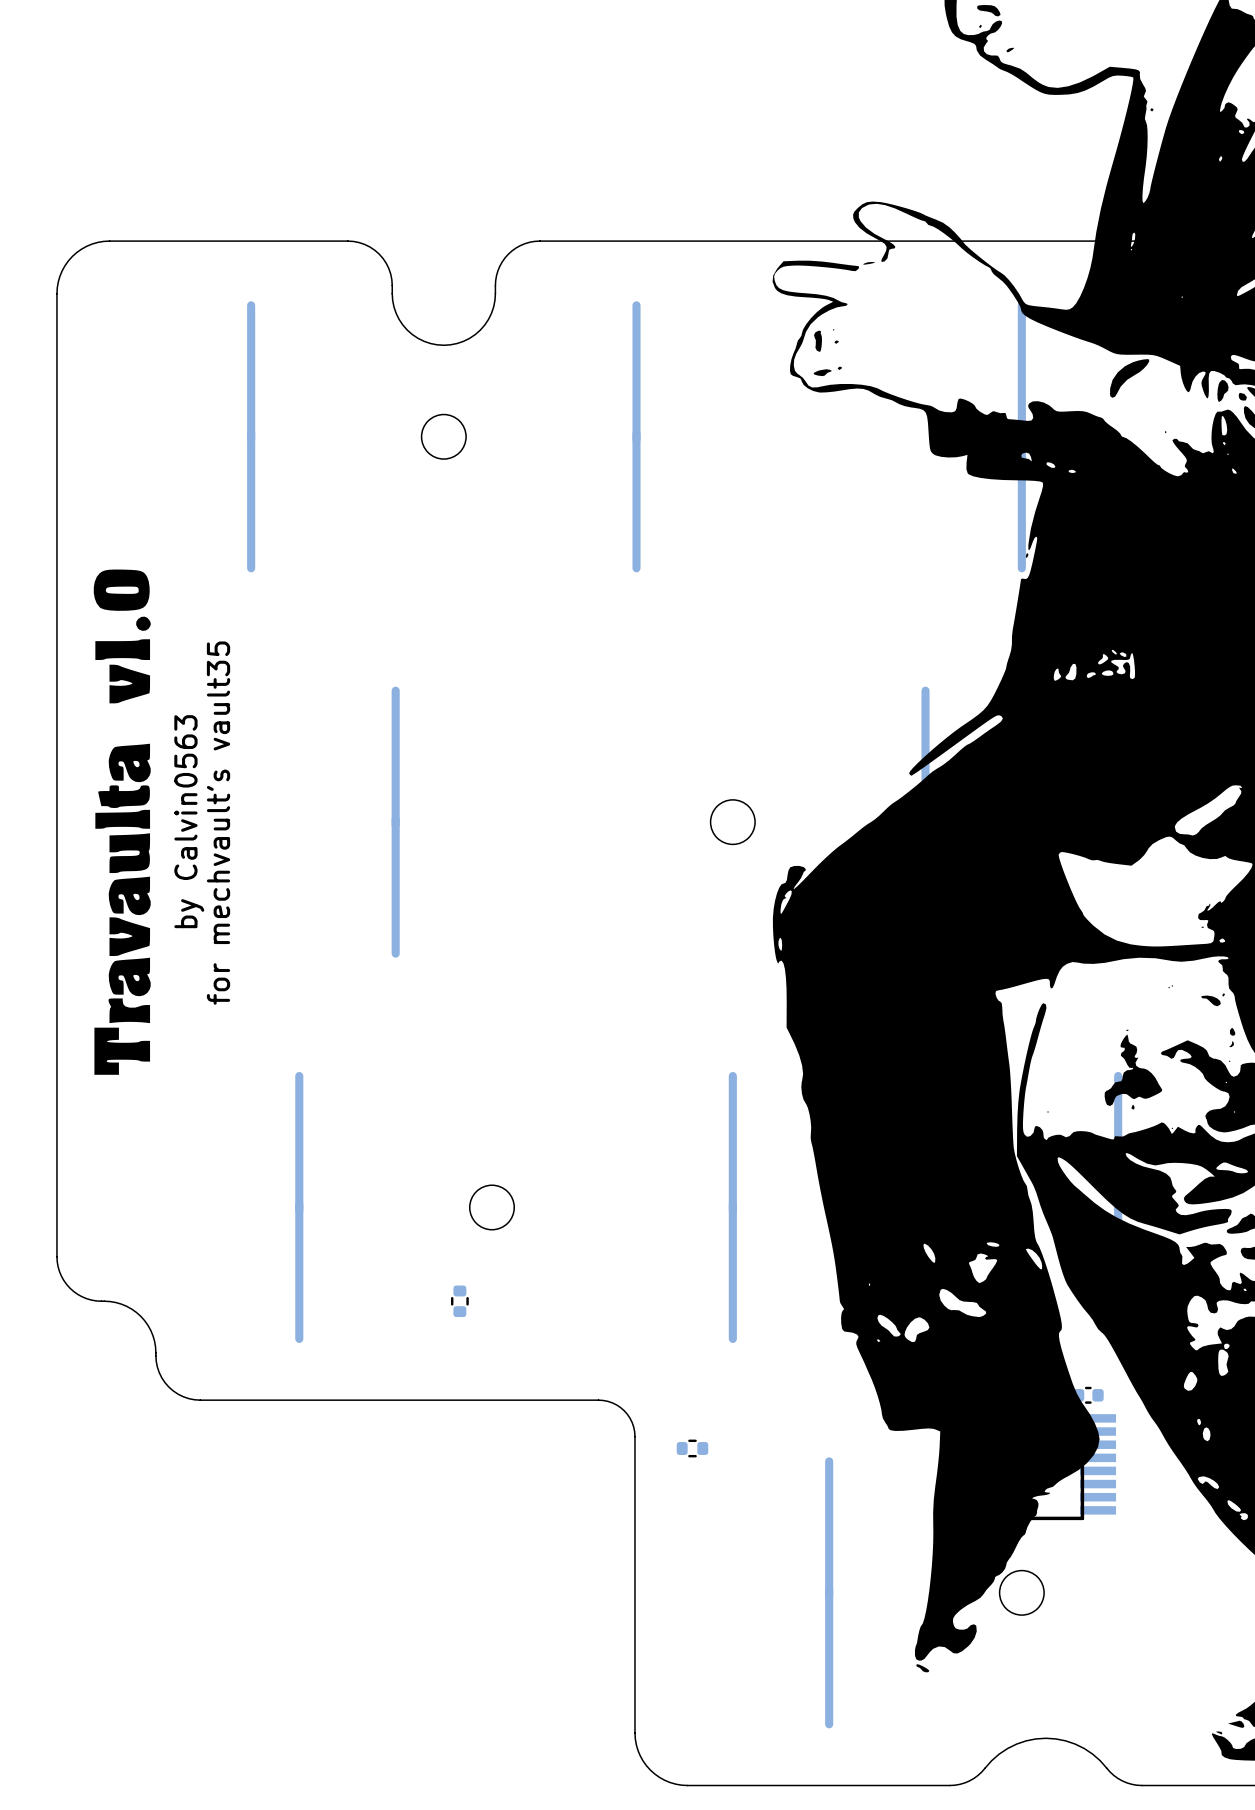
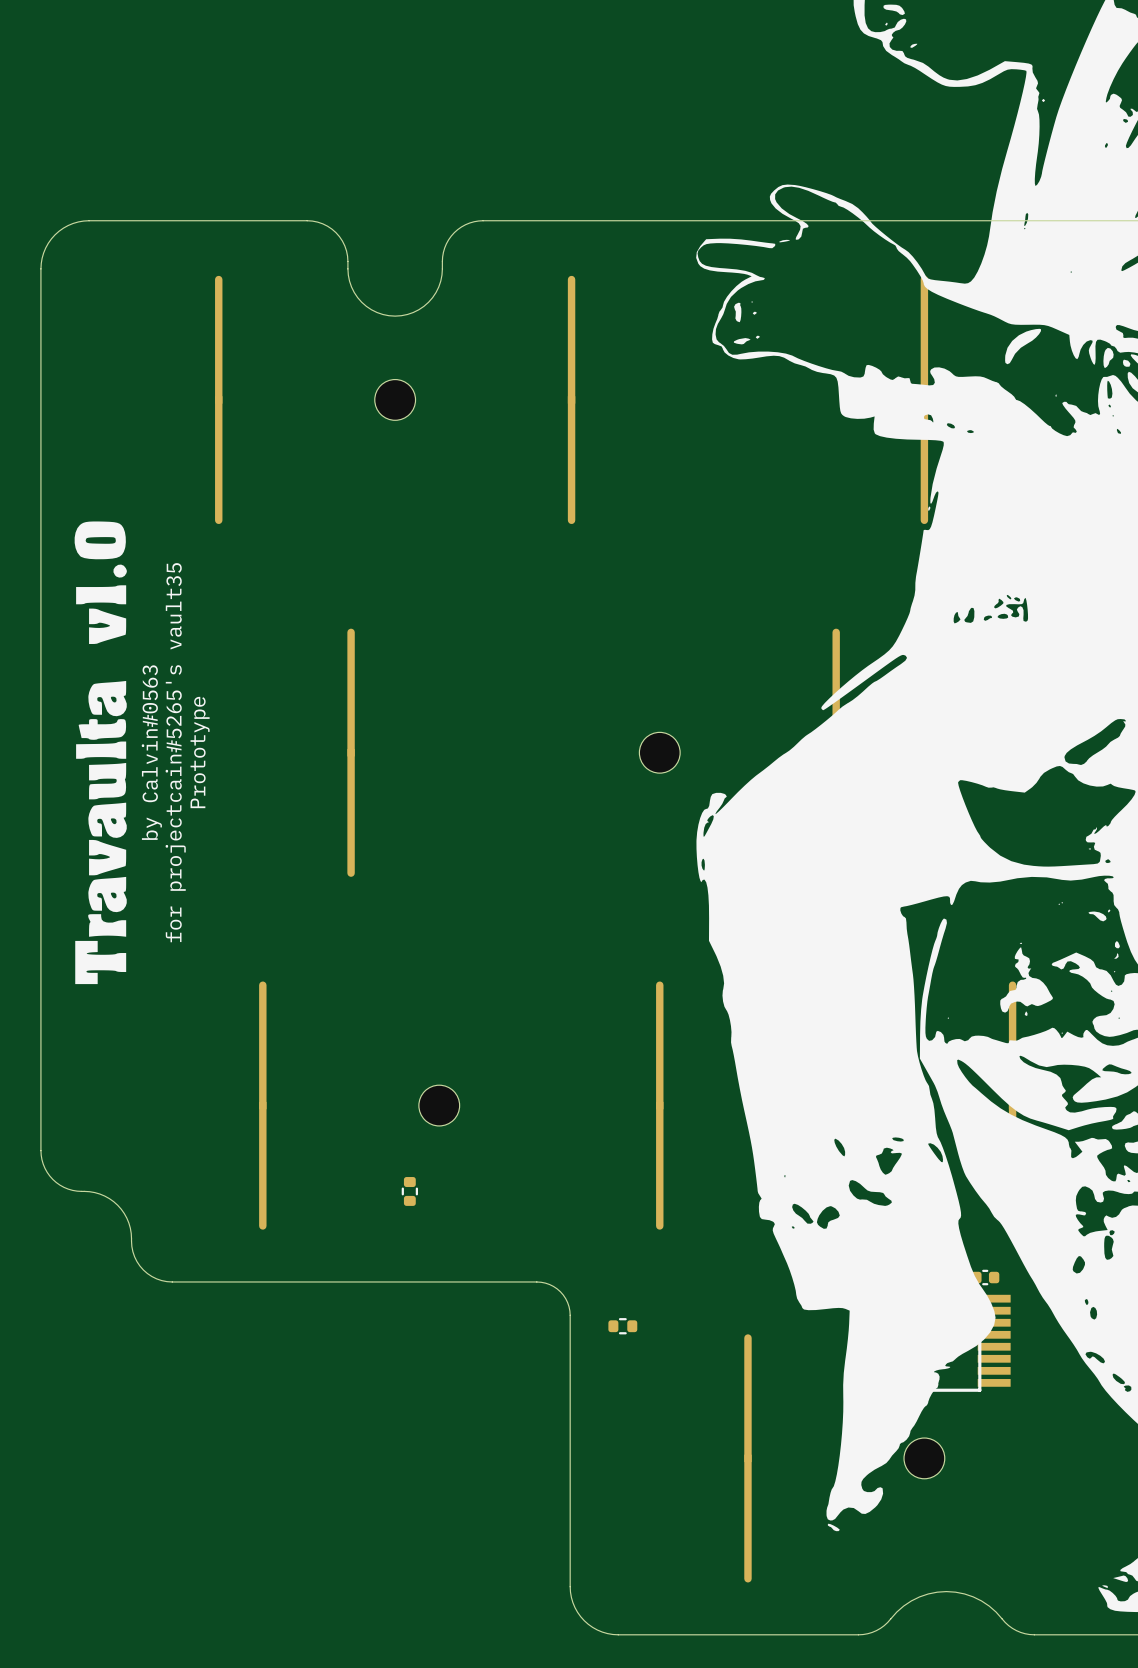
text: by Calvin0563 (189, 821) -> by Calvin#0563 (151, 752)
text: none -> Prototype (200, 752)
text: for mechvault's vault35 (218, 823) -> for projectcain#5265's vault35 (175, 752)

